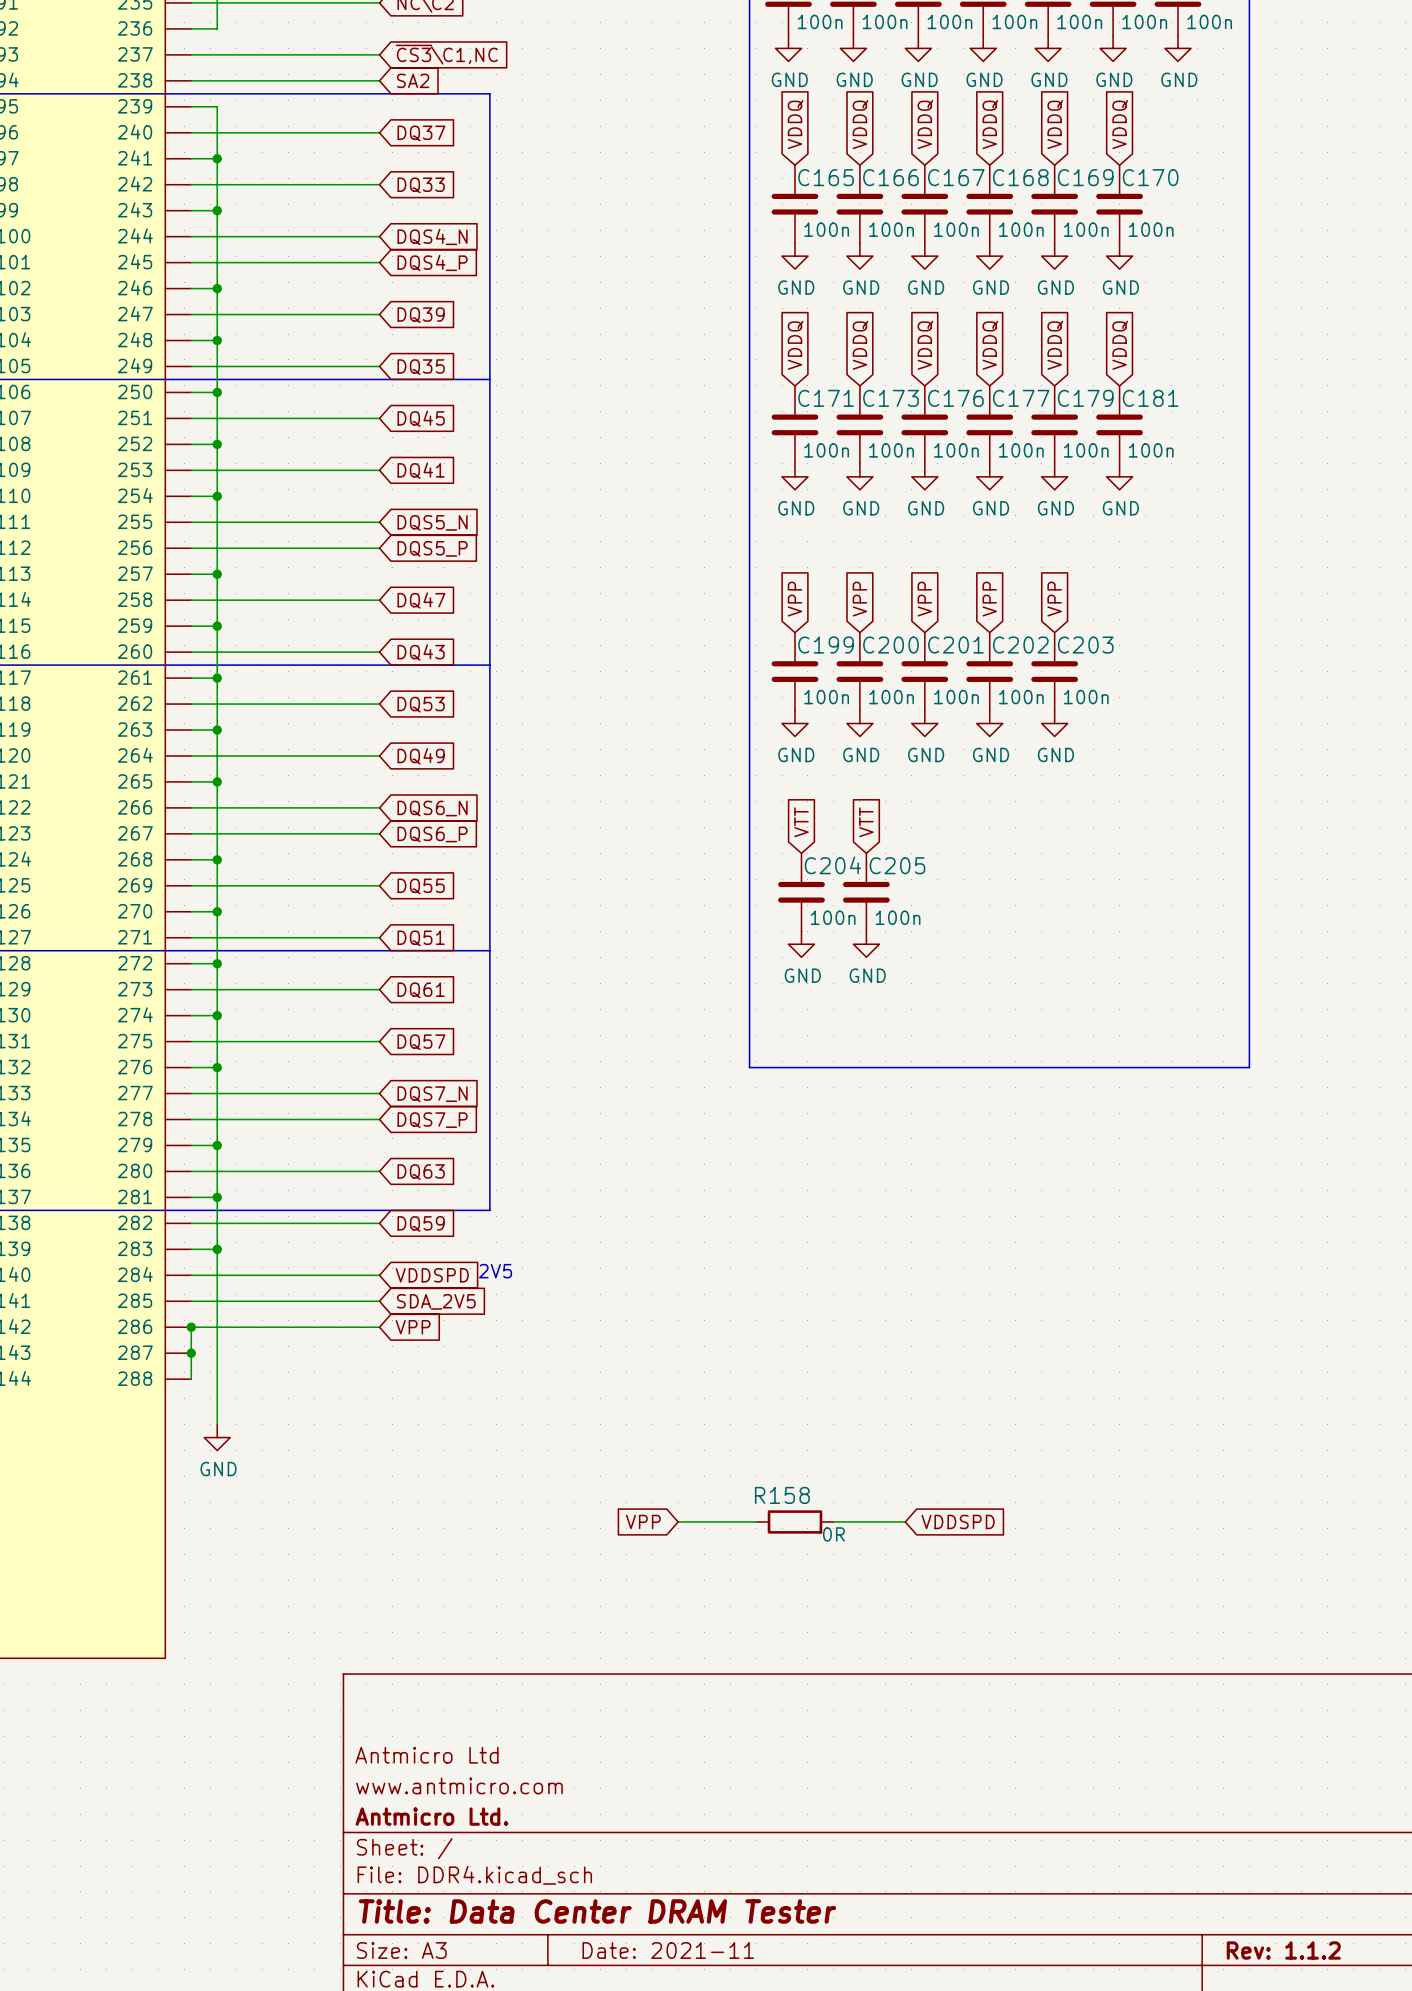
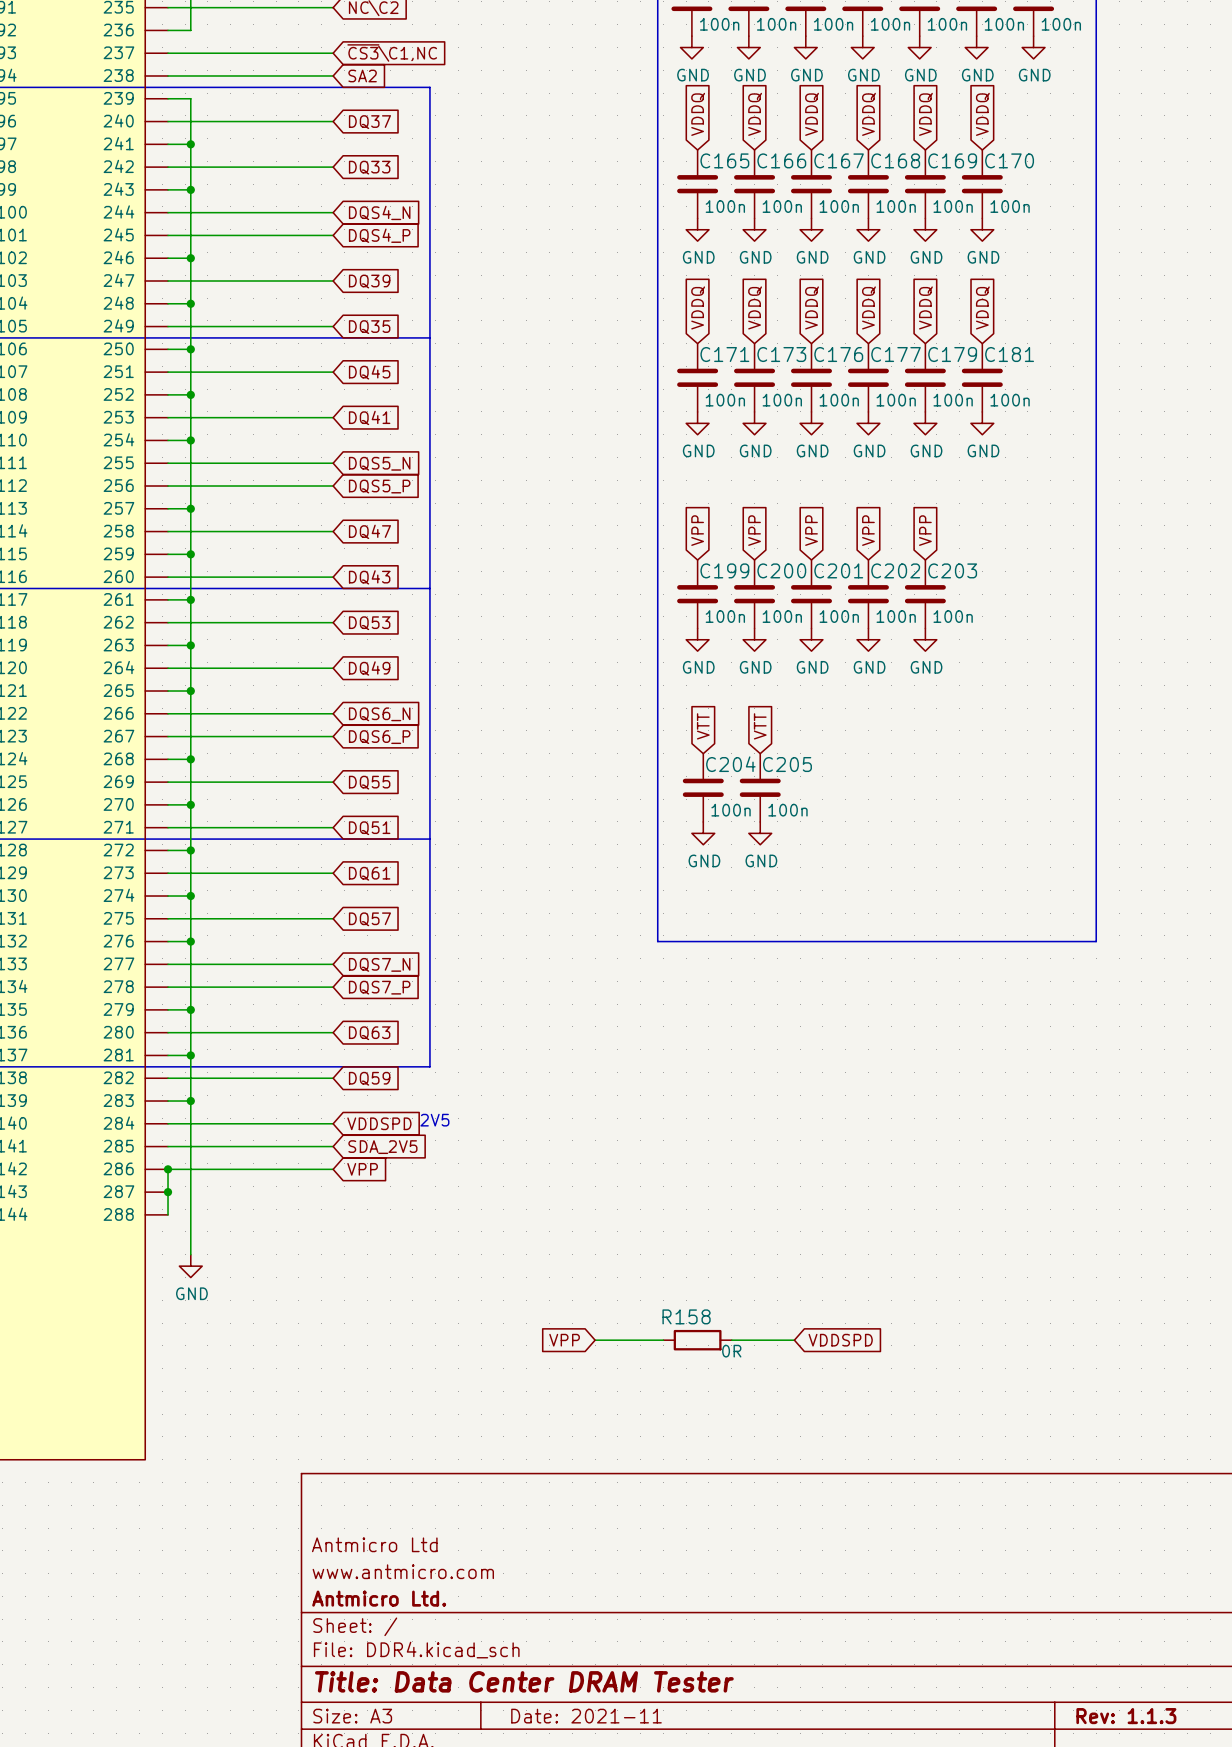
title block: Rev: 1.1.2 (1283, 1950) -> Rev: 1.1.3 (1126, 1716)

